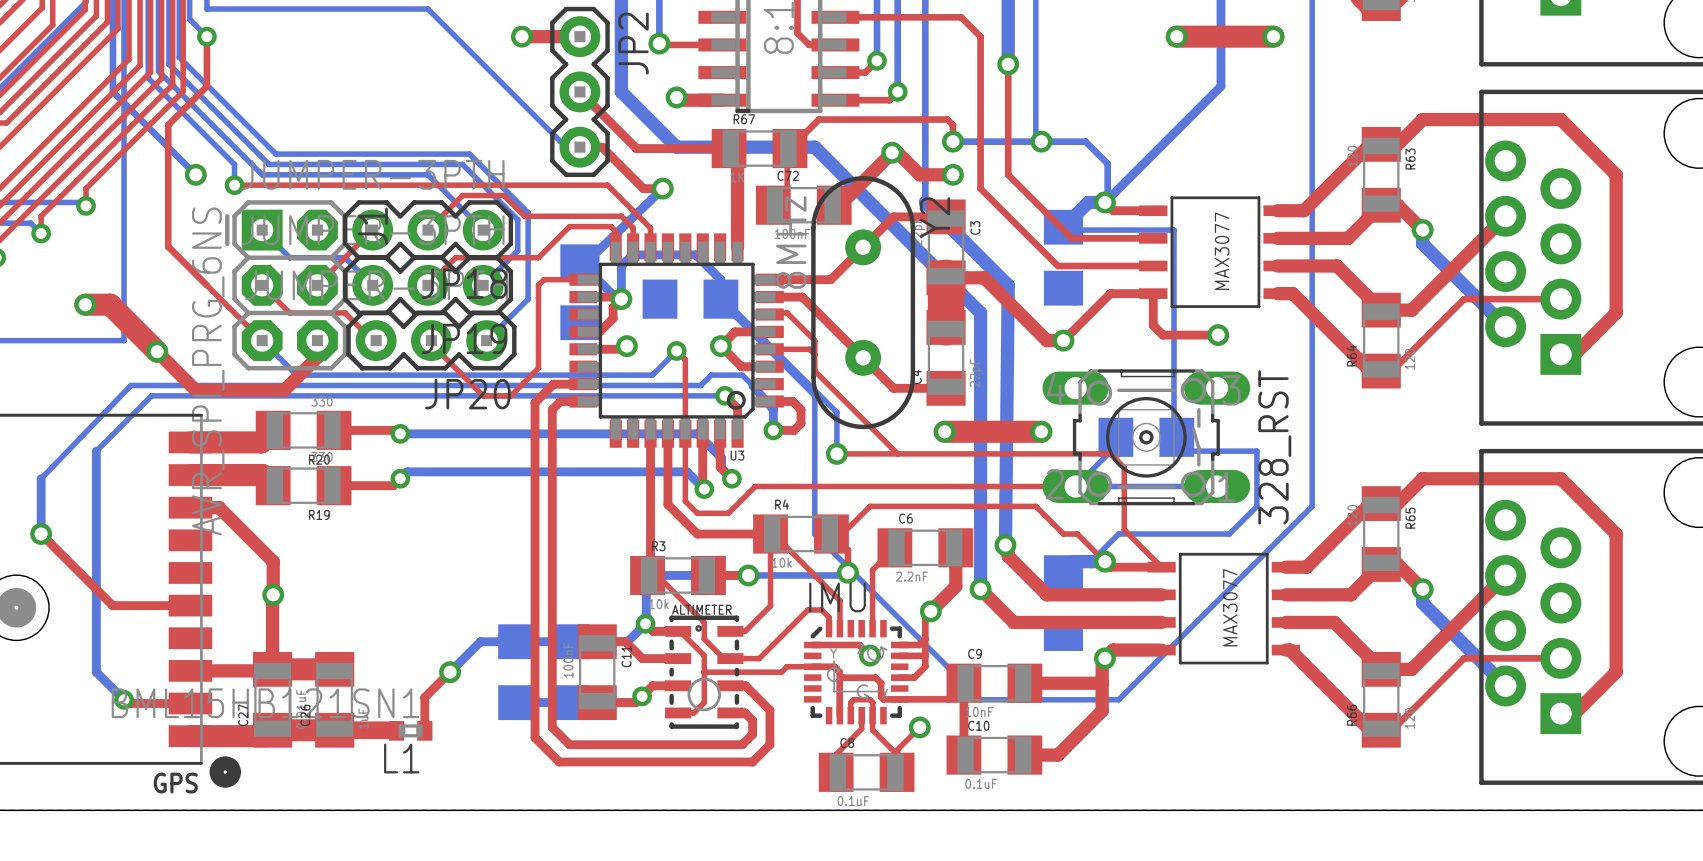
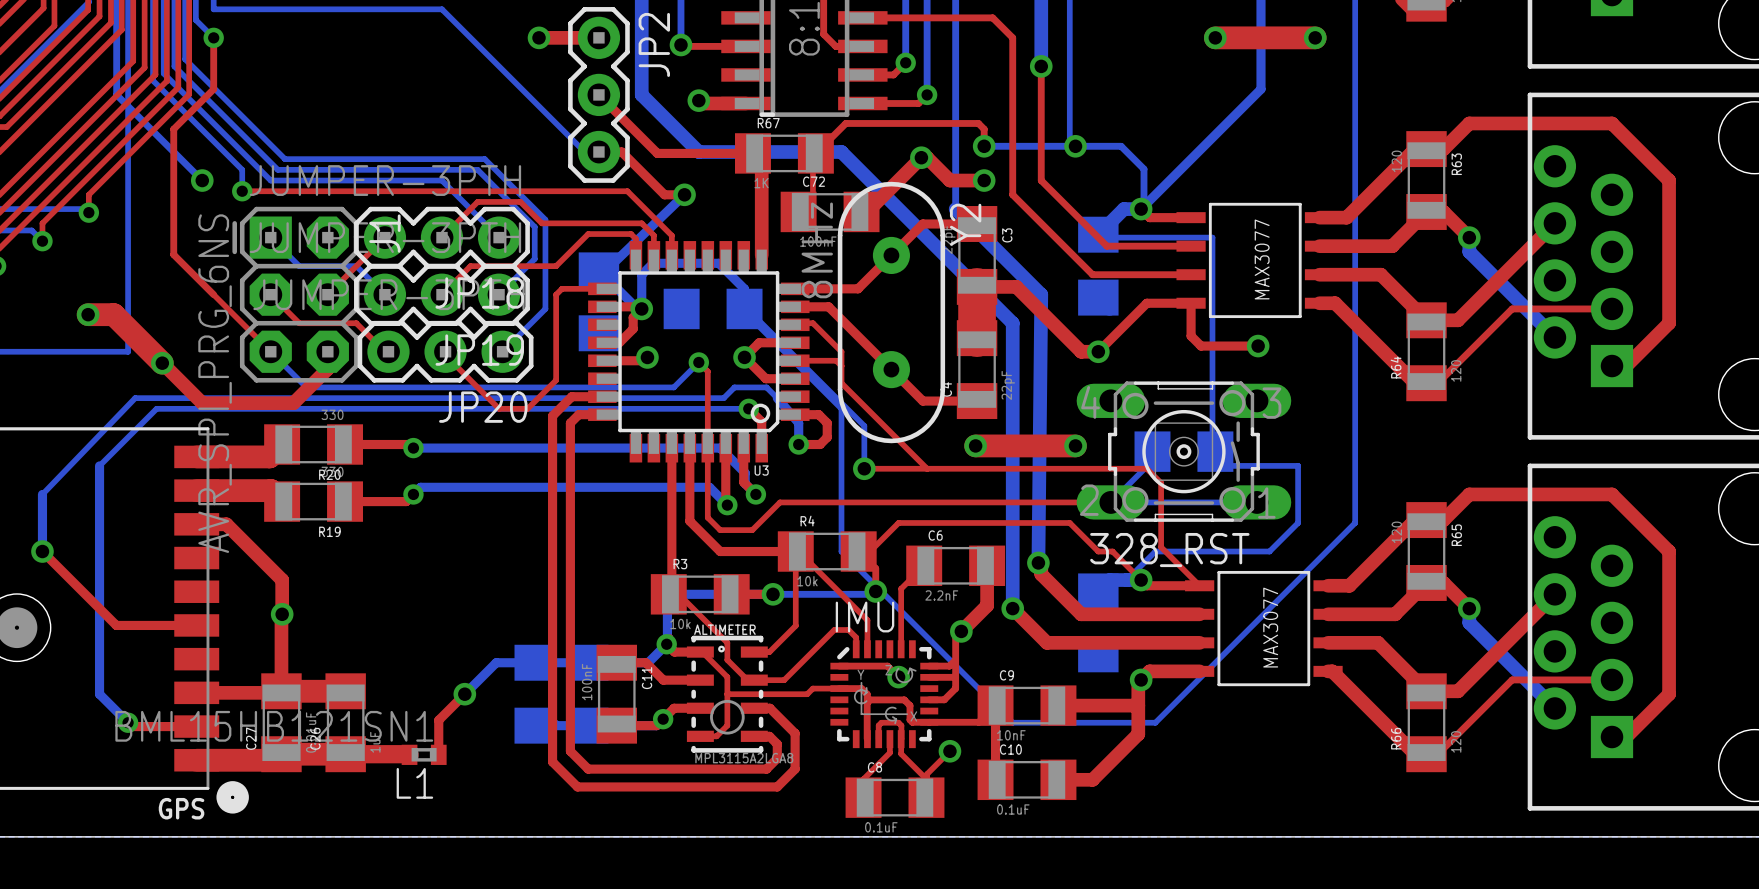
328_RST name rotation: 0° (1274, 447) -> 90° clockwise (1169, 550)
ALTIMETER value: none -> MPL3115A2LGA8 (744, 758)

